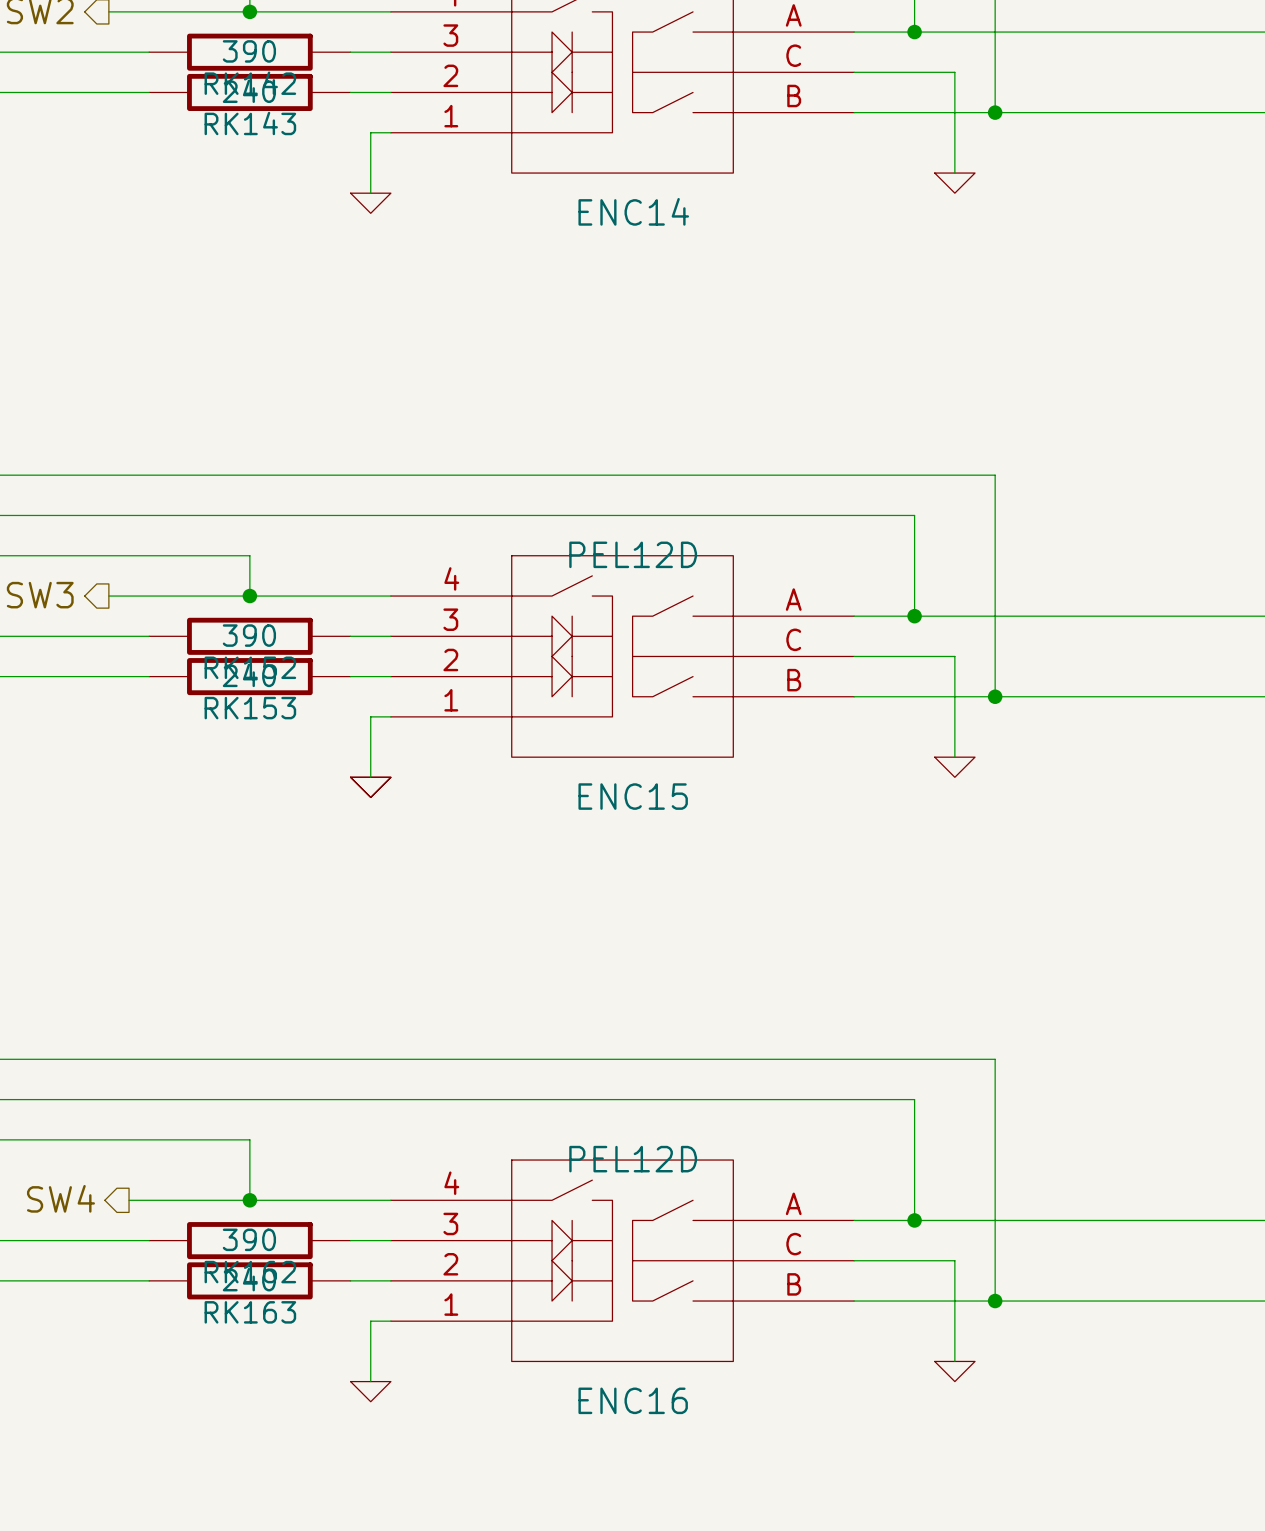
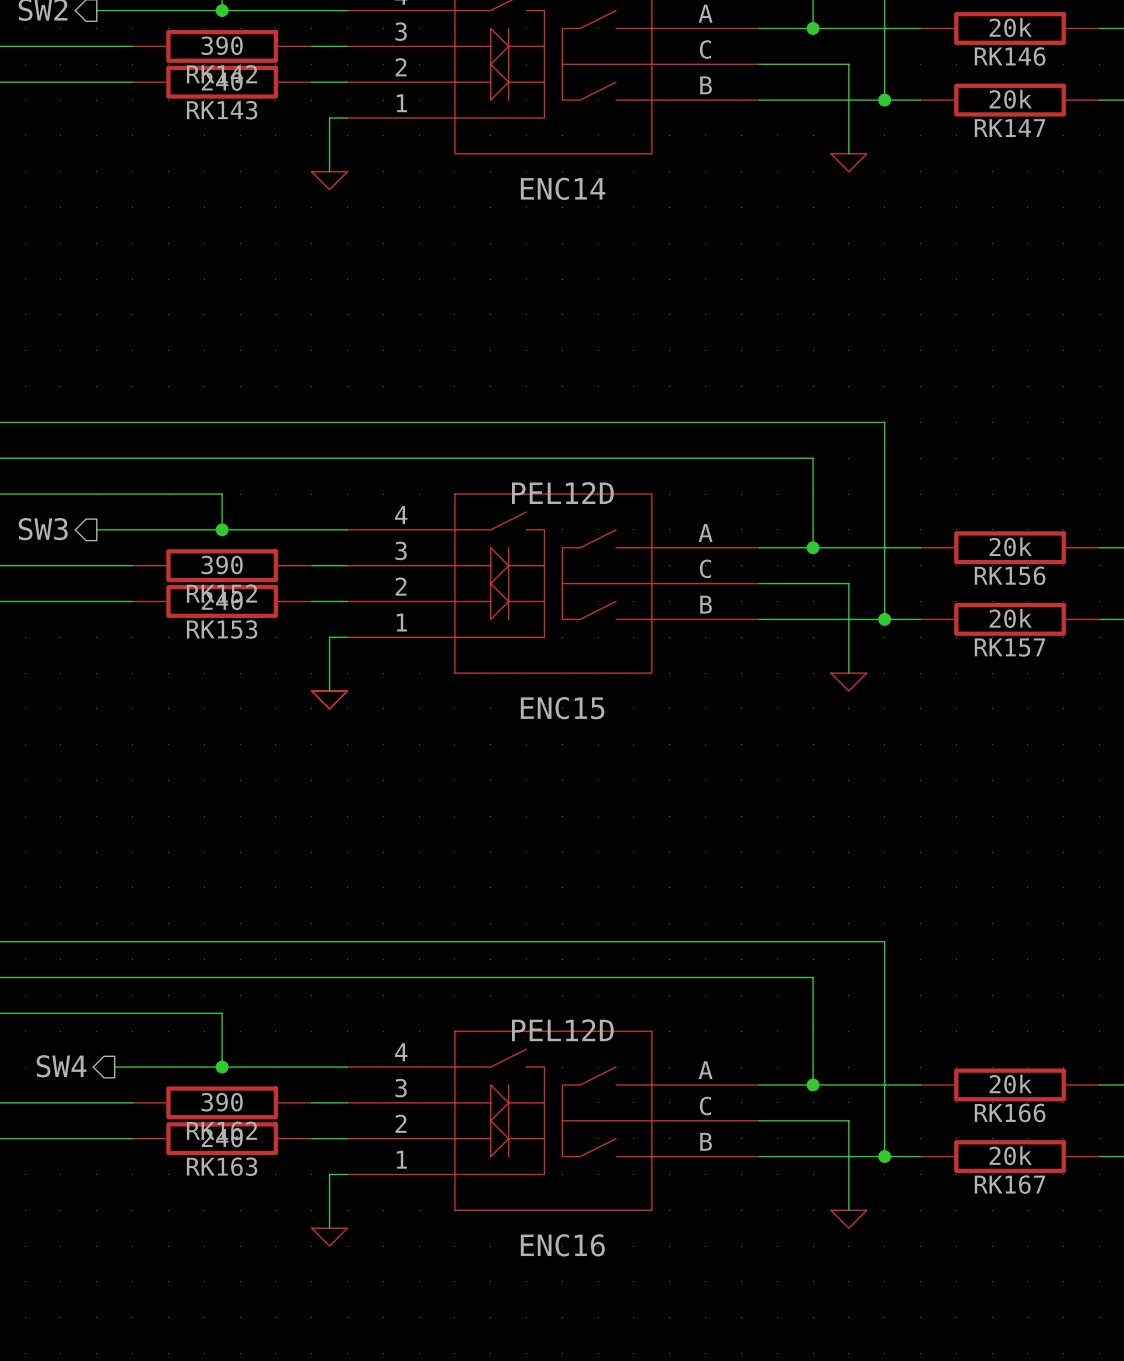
wire: (1035, 32) (1236, 32) -> none
RK146: none -> 20k (1010, 28)
wire: (1035, 112) (1236, 112) -> none
RK147: none -> 20k (1010, 100)
wire: (1035, 616) (1236, 616) -> none
RK156: none -> 20k (1010, 547)
wire: (1035, 696) (1236, 696) -> none
RK157: none -> 20k (1010, 619)
wire: (1035, 1220) (1236, 1220) -> none
RK166: none -> 20k (1010, 1084)
wire: (1035, 1301) (1236, 1301) -> none
RK167: none -> 20k (1010, 1156)

